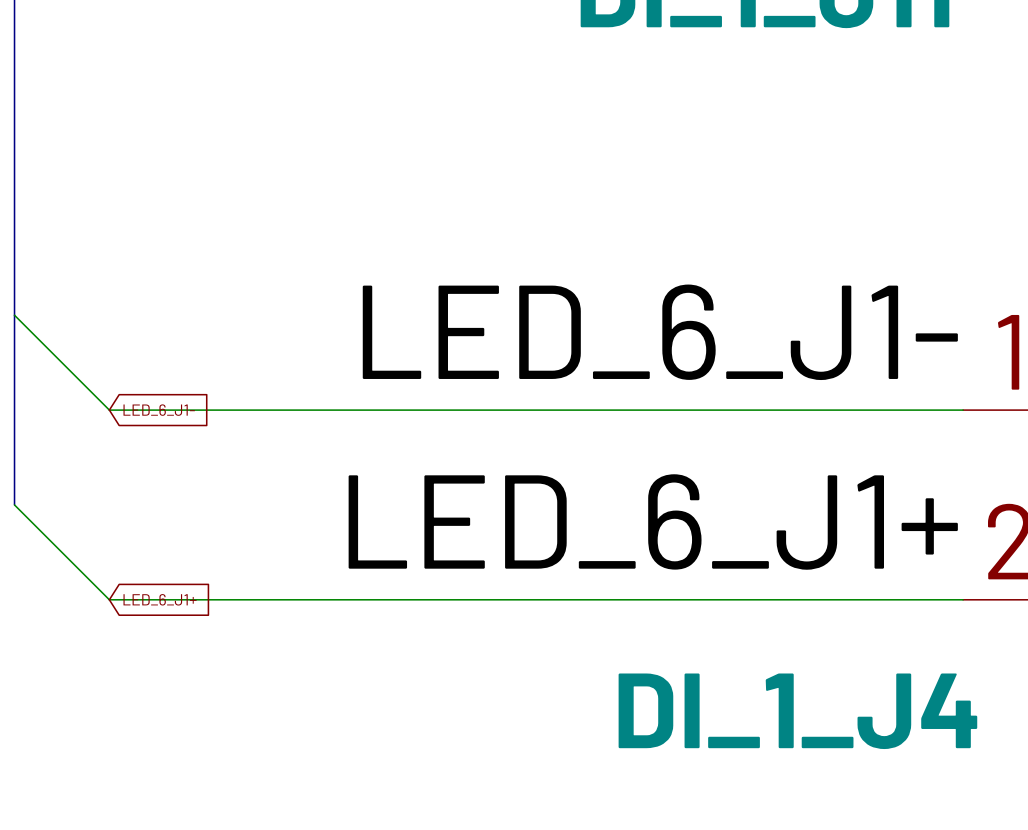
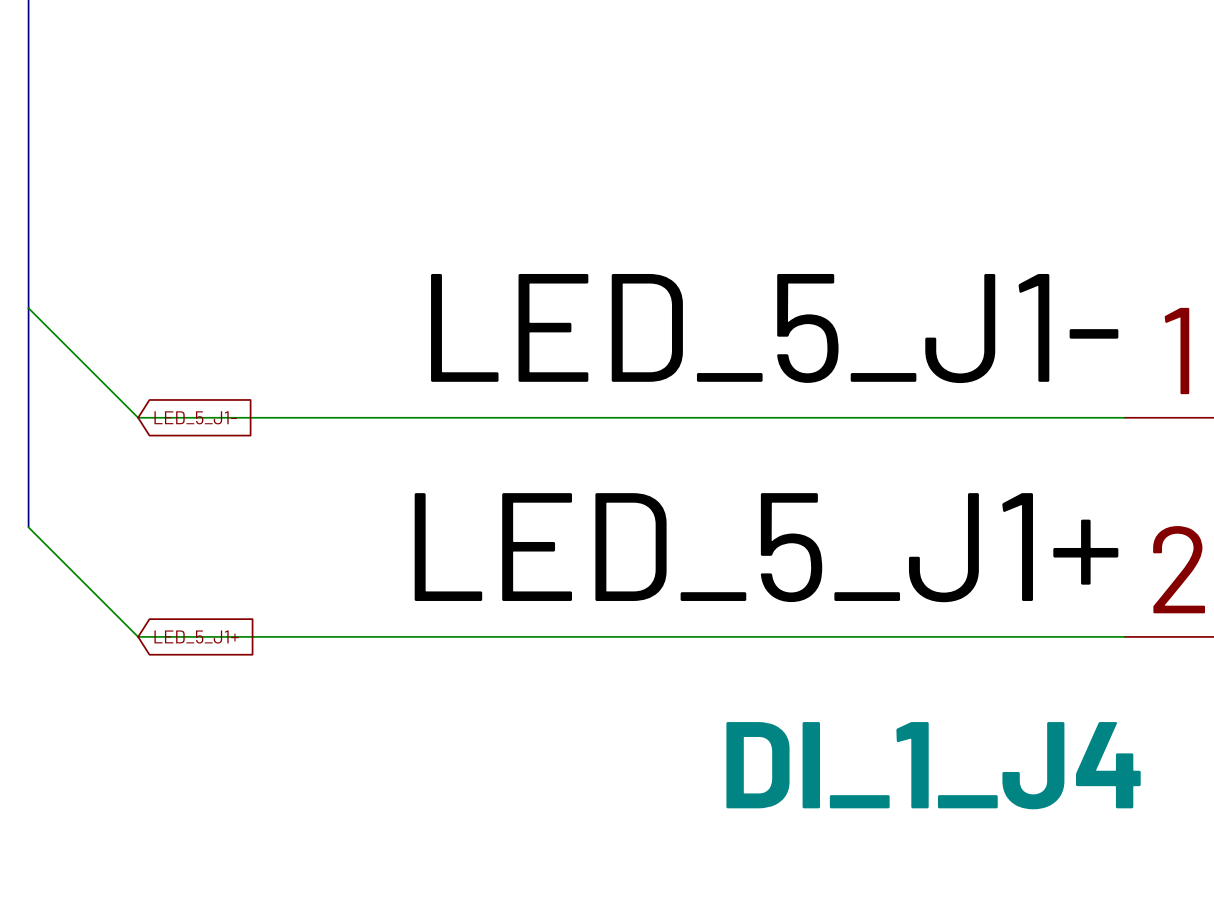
label: LED_6_J1- (660, 332) -> LED_5_J1- (774, 328)
global label: LED_6_J1- (159, 410) -> LED_5_J1- (195, 417)
label: LED_6_J1+ (653, 522) -> LED_5_J1+ (766, 547)
global label: LED_6_J1+ (160, 599) -> LED_5_J1+ (196, 637)

